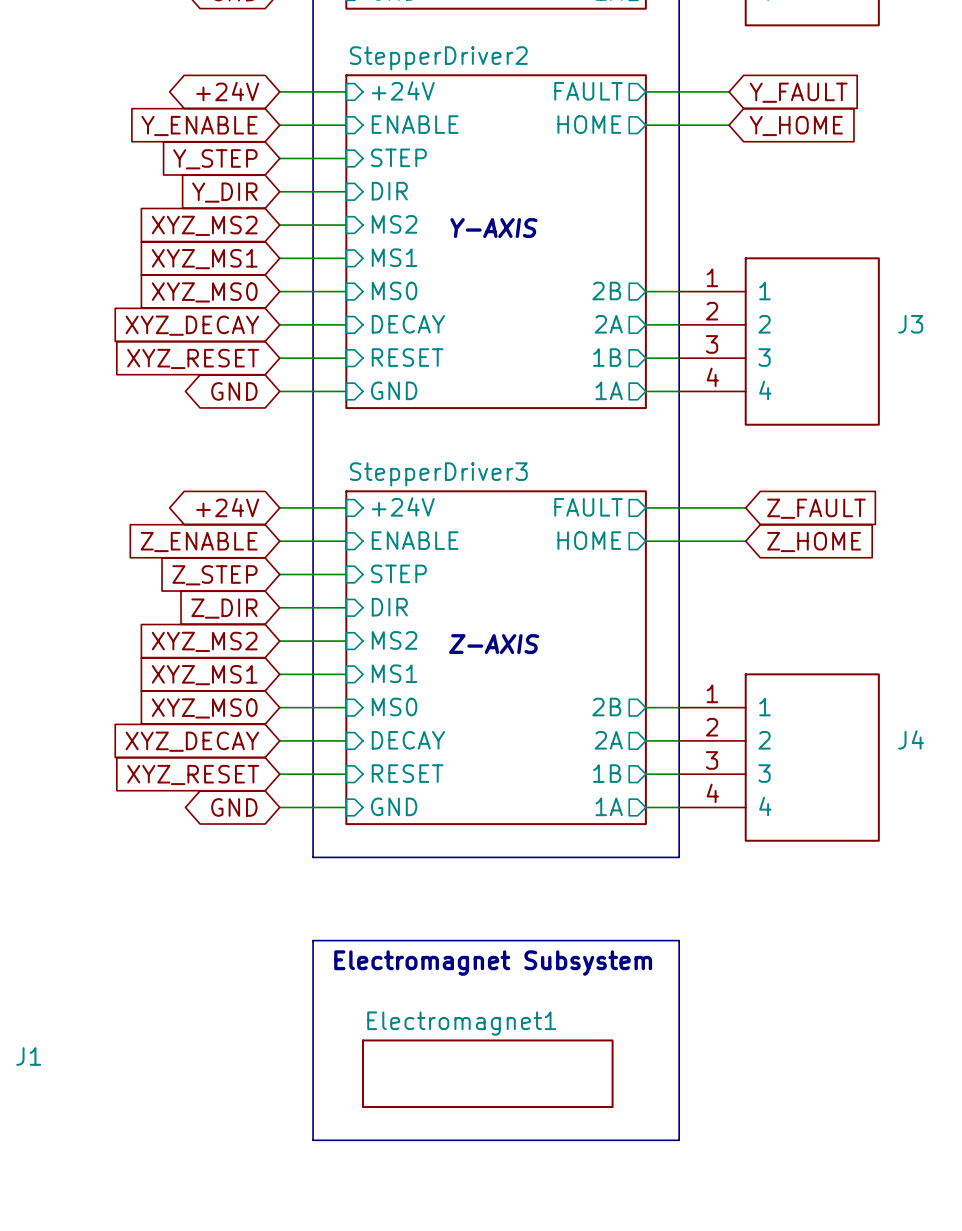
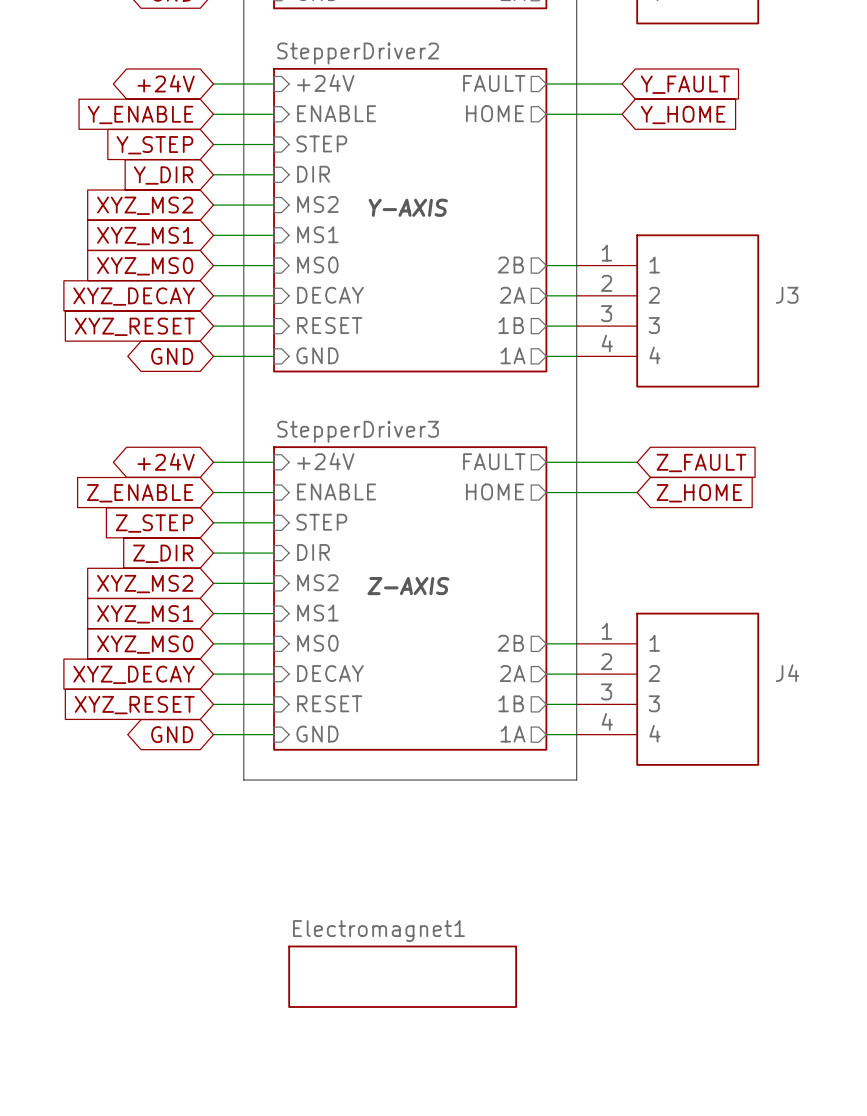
line: (313, 940) (313, 1140) (679, 1140) (679, 940) (313, 940) -> none
text: Electromagnet Subsystem (493, 963) -> none

